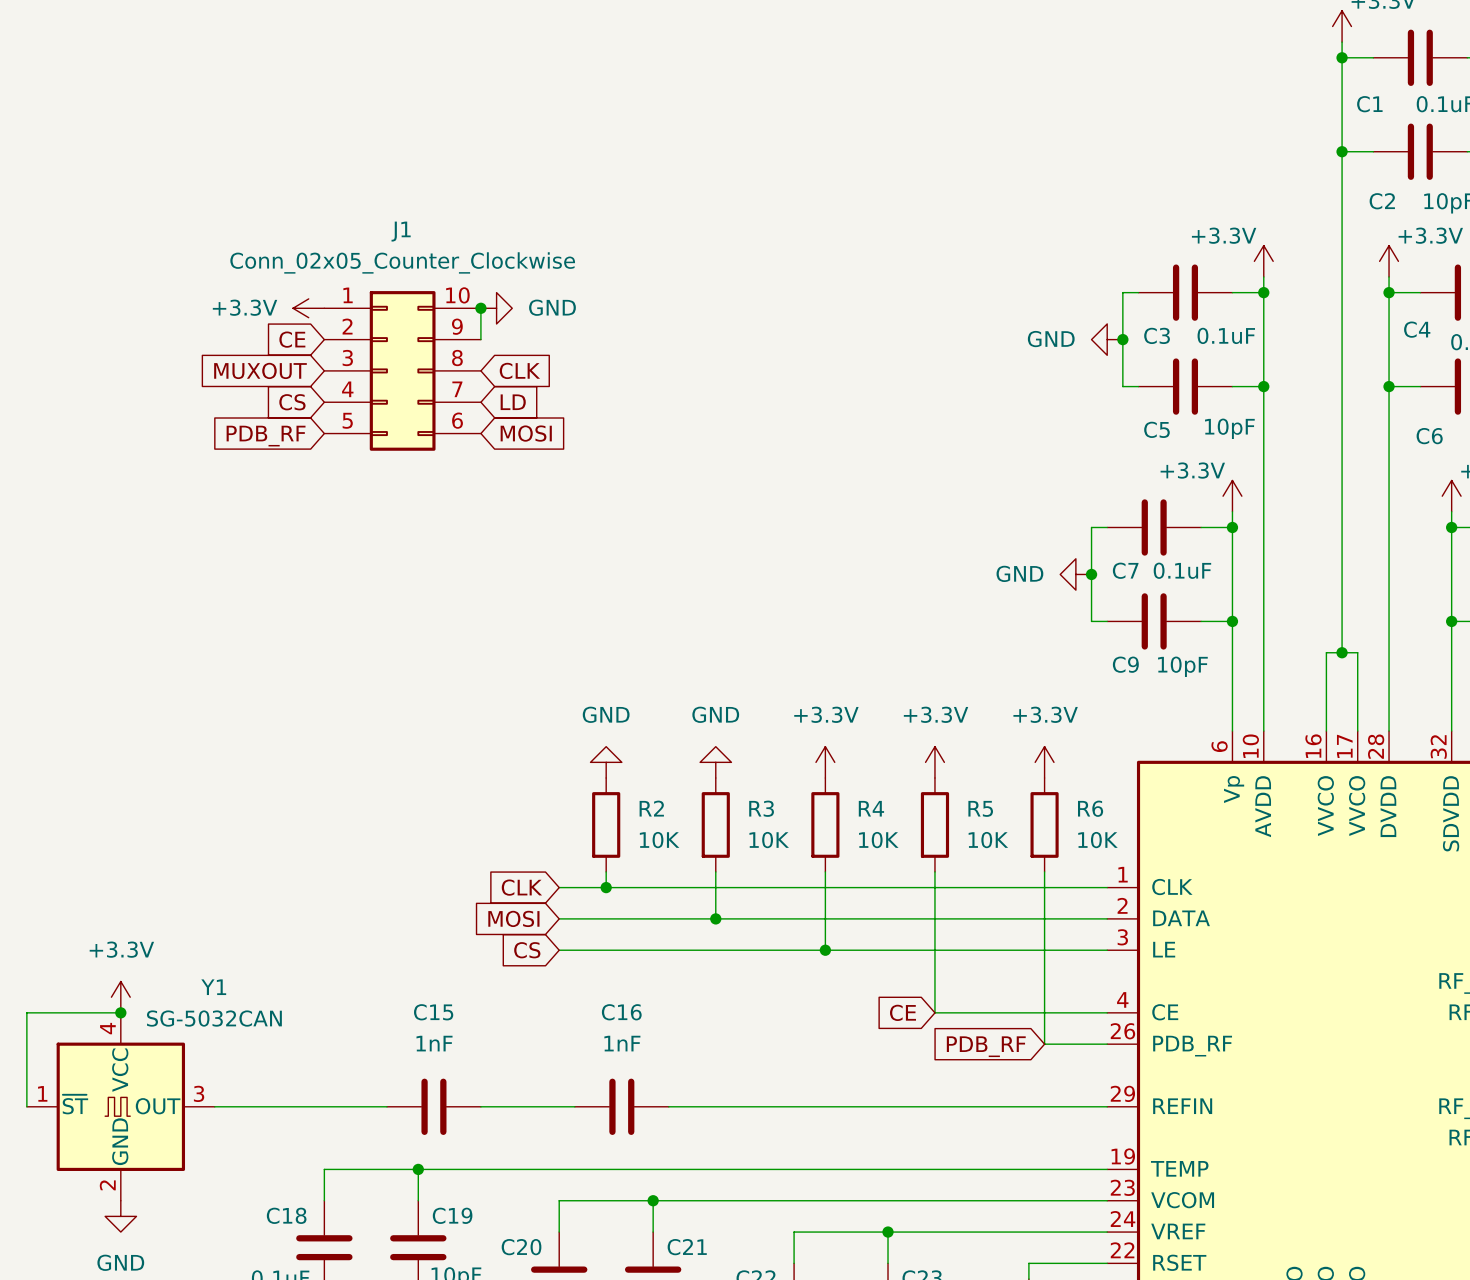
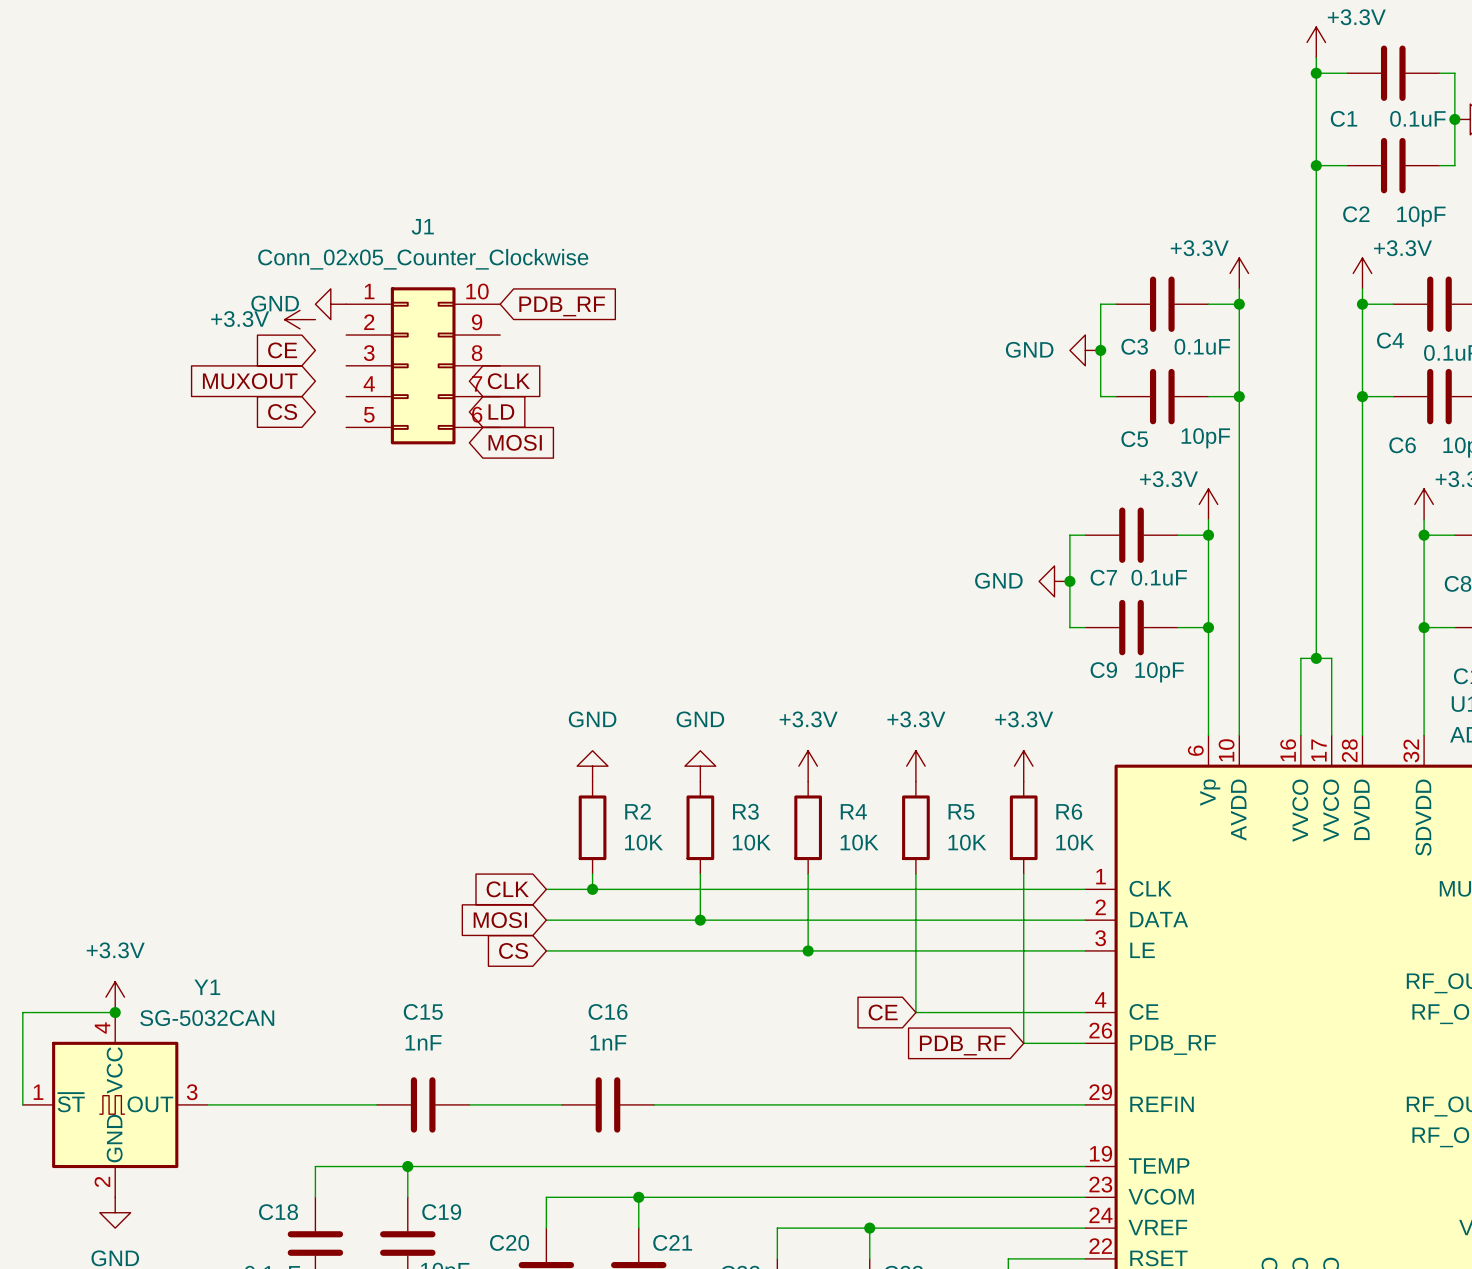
wire: (480, 308) (480, 339) -> none
junction: (480, 308) -> none
power symbol rotation: 0° (496, 308) -> 180° (330, 304)
power symbol position: GND (496, 308) -> GND (330, 304)
J1 position: (402, 370) -> (423, 365)
global label rotation: 0° (266, 436) -> 180° (562, 306)
global label position: PDB_RF (266, 436) -> PDB_RF (562, 306)

